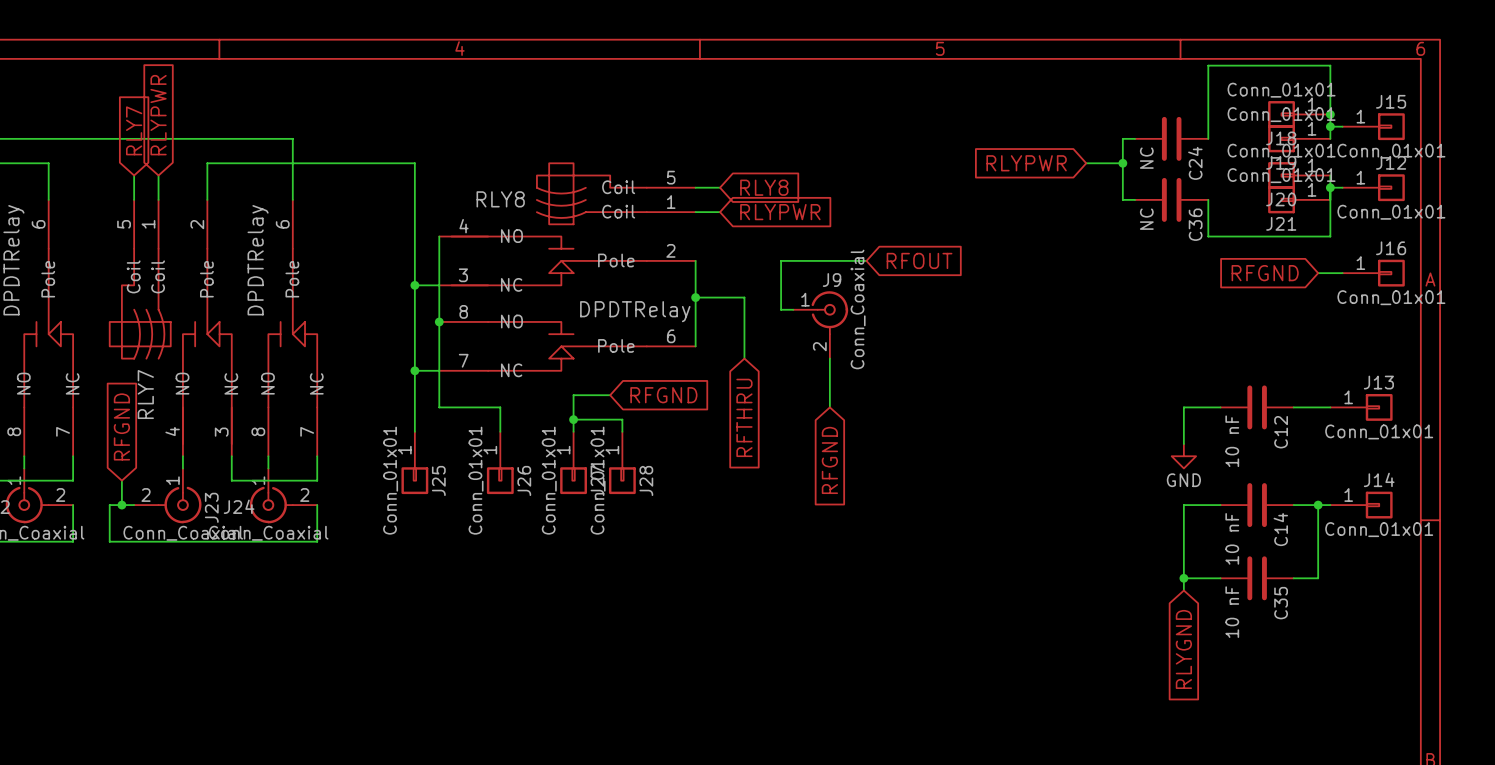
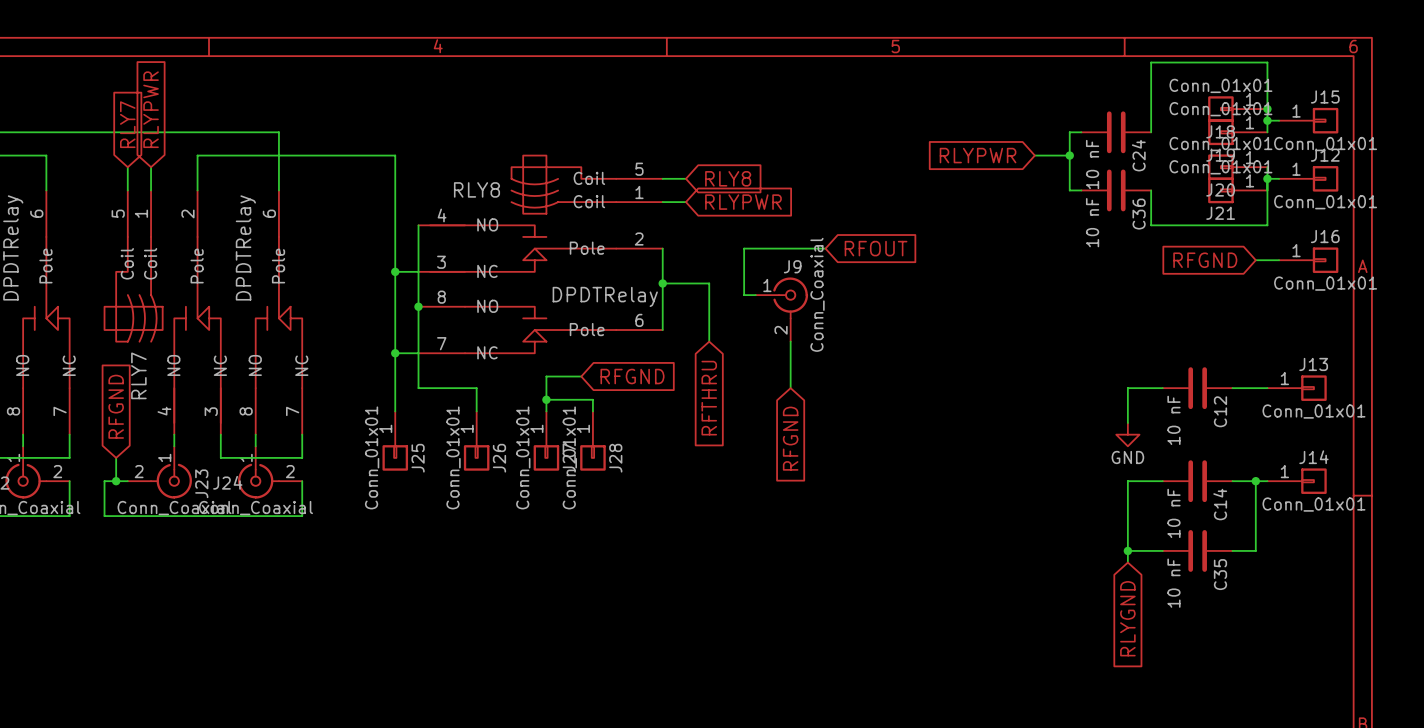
C24 value: NC (1146, 158) -> 10 nF (1092, 164)
C36 value: NC (1146, 219) -> 10 nF (1092, 222)

